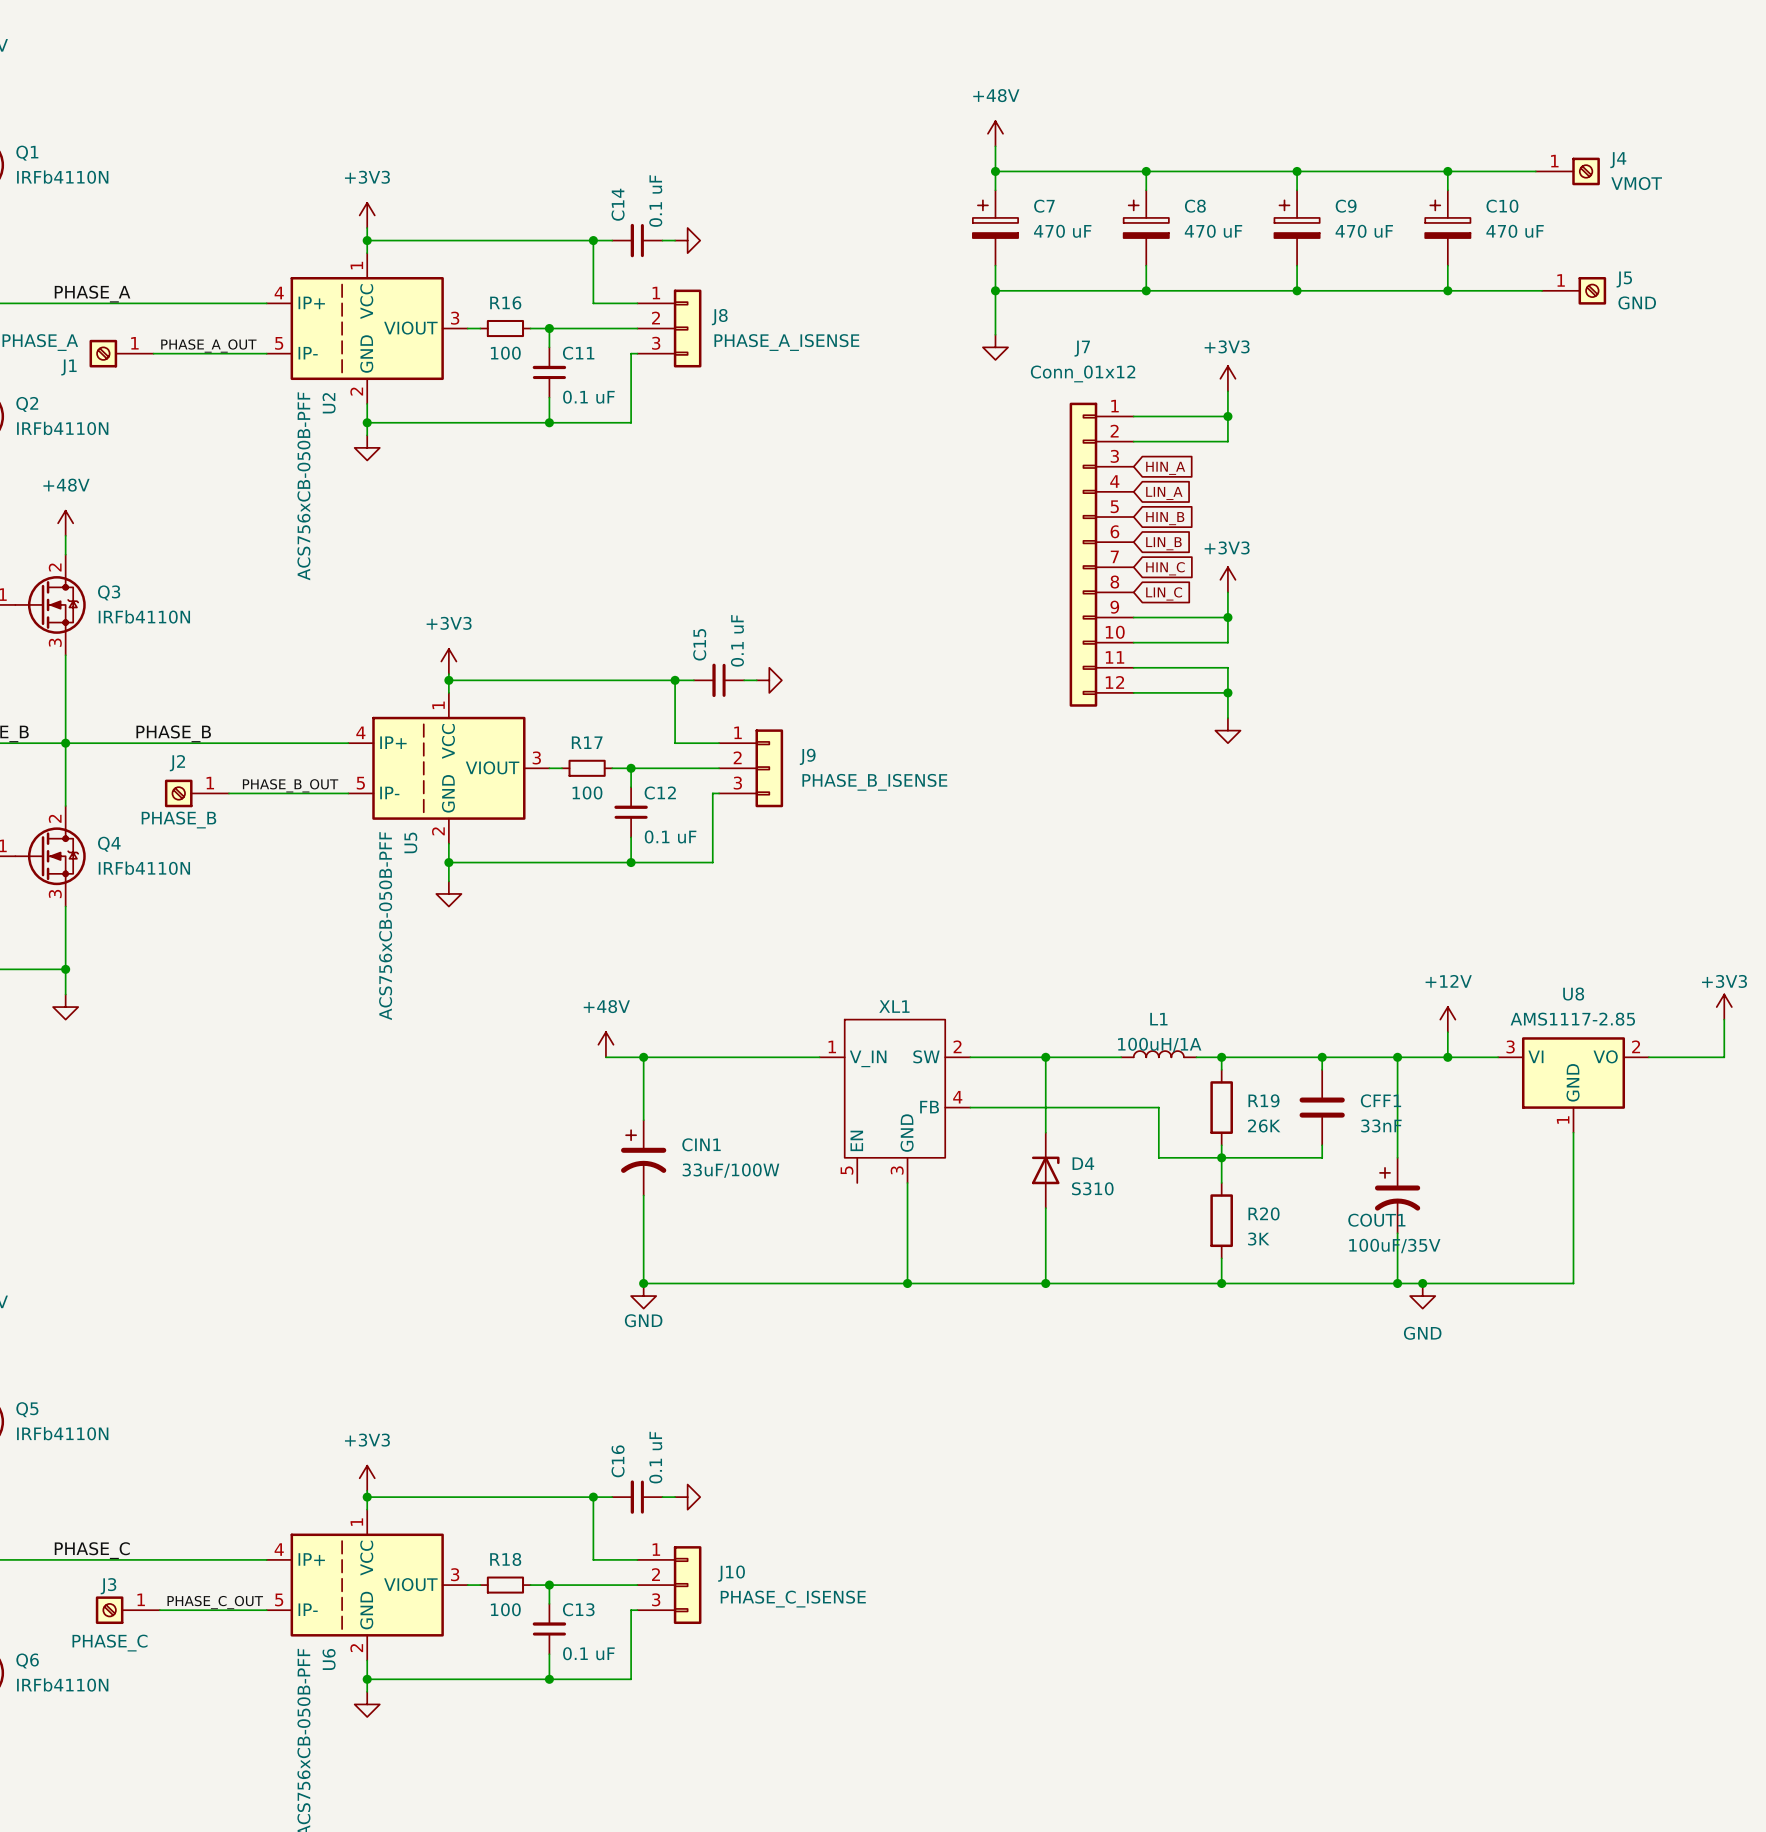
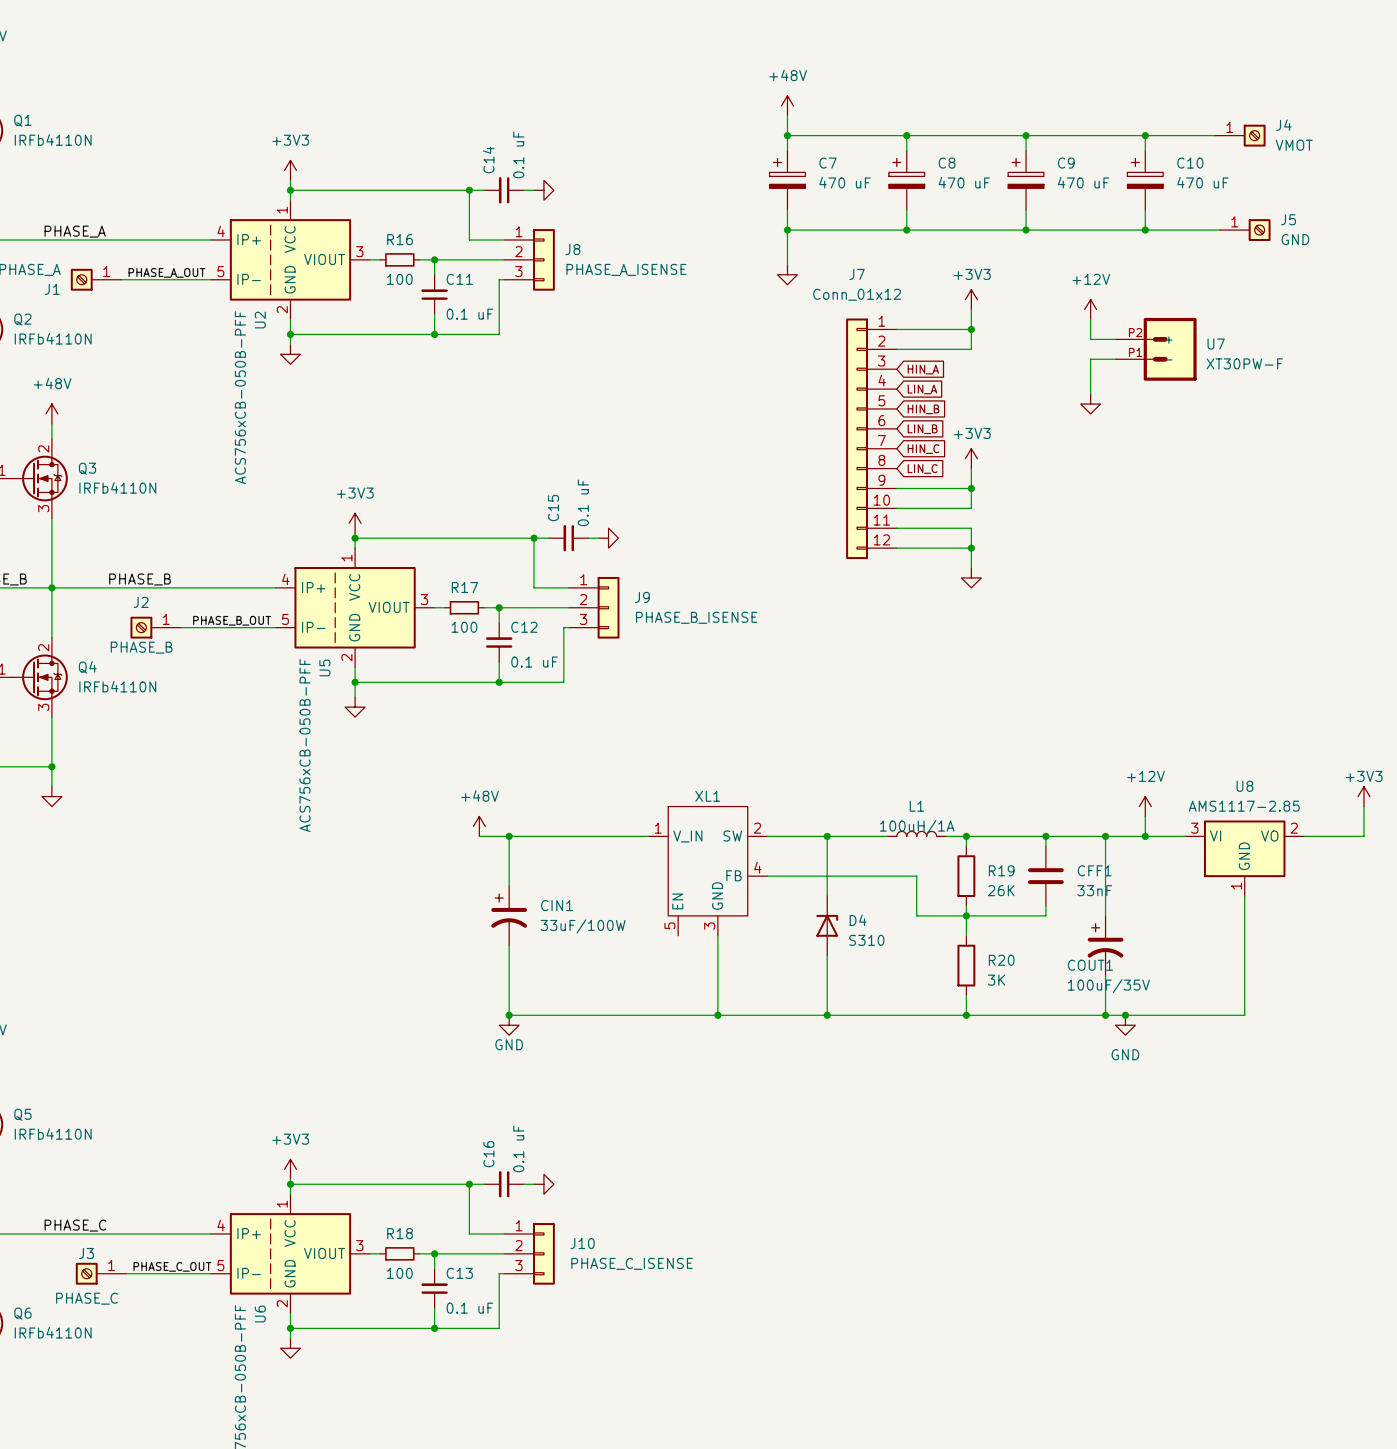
power symbol: none -> +12V (1090, 309)
wire: none -> (1090, 319) (1090, 339) (1115, 339)
U7: none -> XT30PW-F (1156, 349)
wire: none -> (1115, 359) (1090, 359) (1090, 394)
power symbol: none -> (1090, 404)

